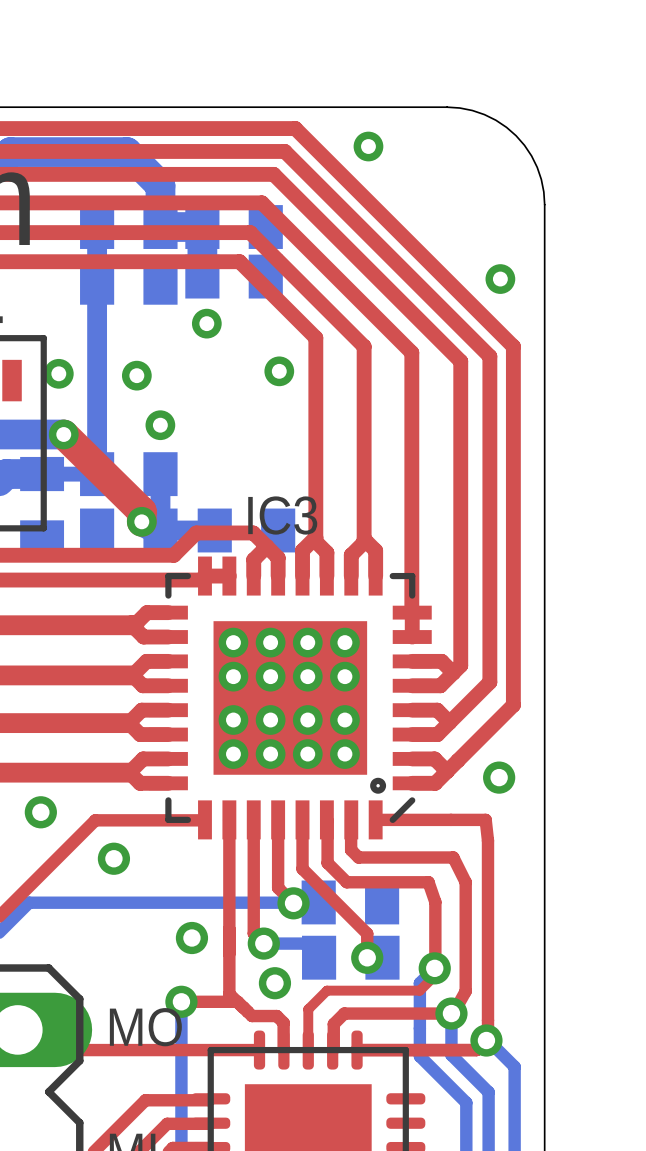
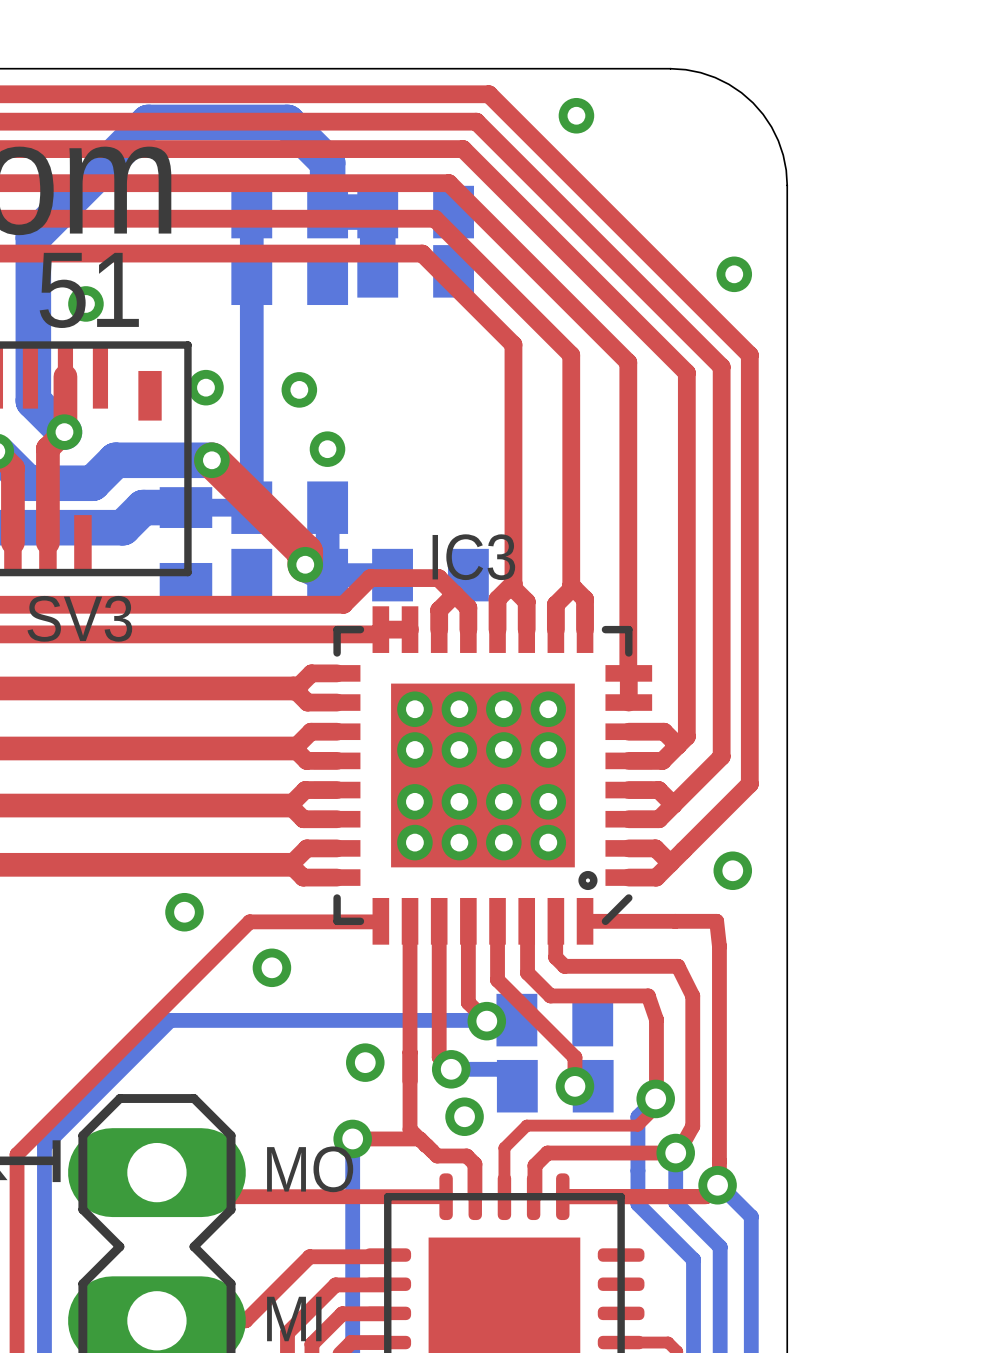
via: (206, 323) -> none
via: (279, 371) -> none

